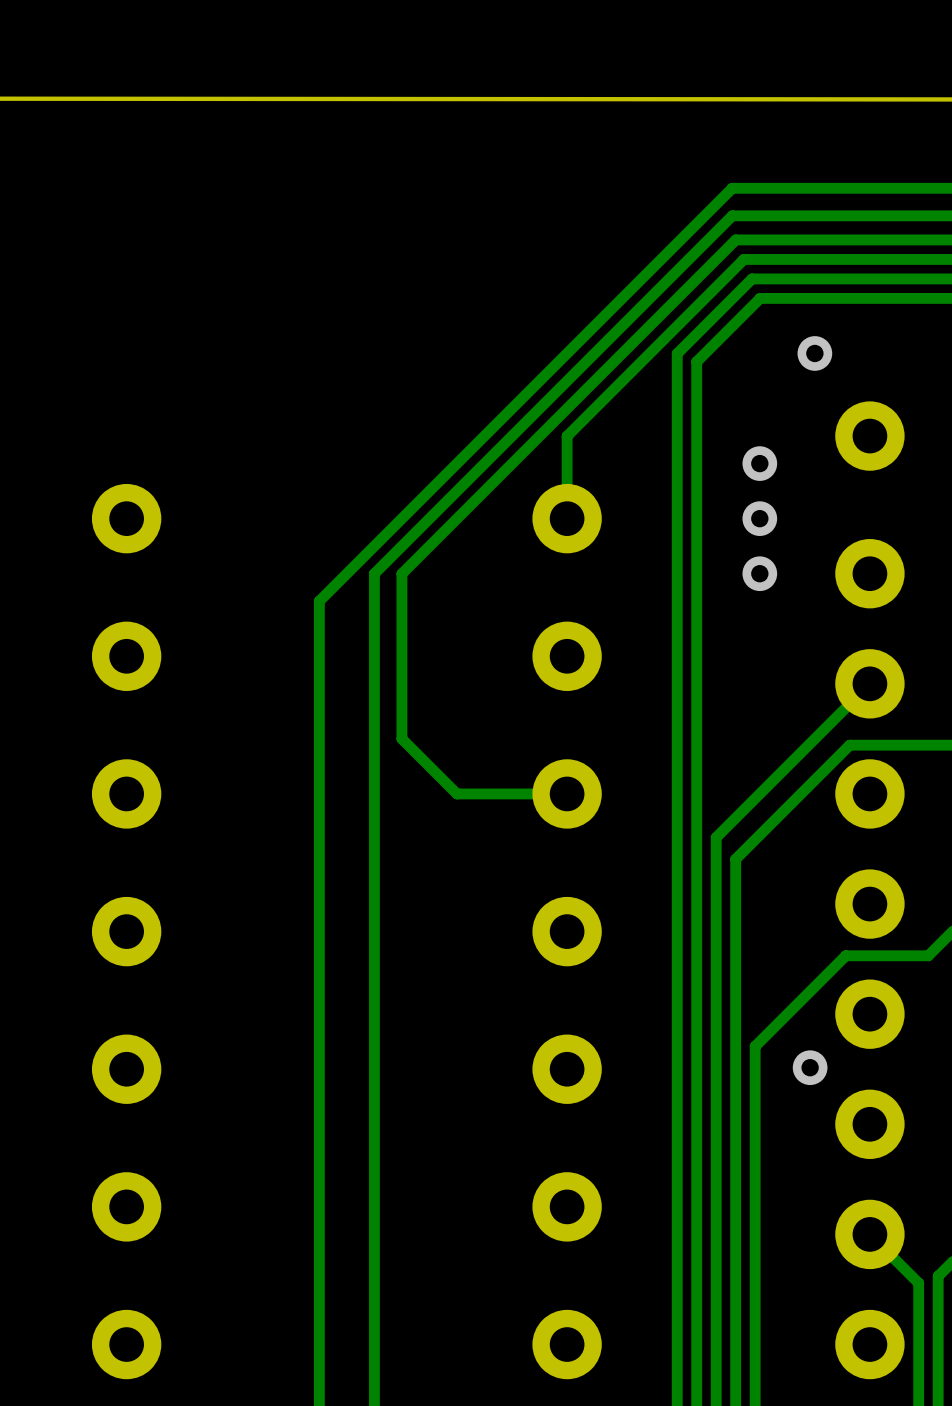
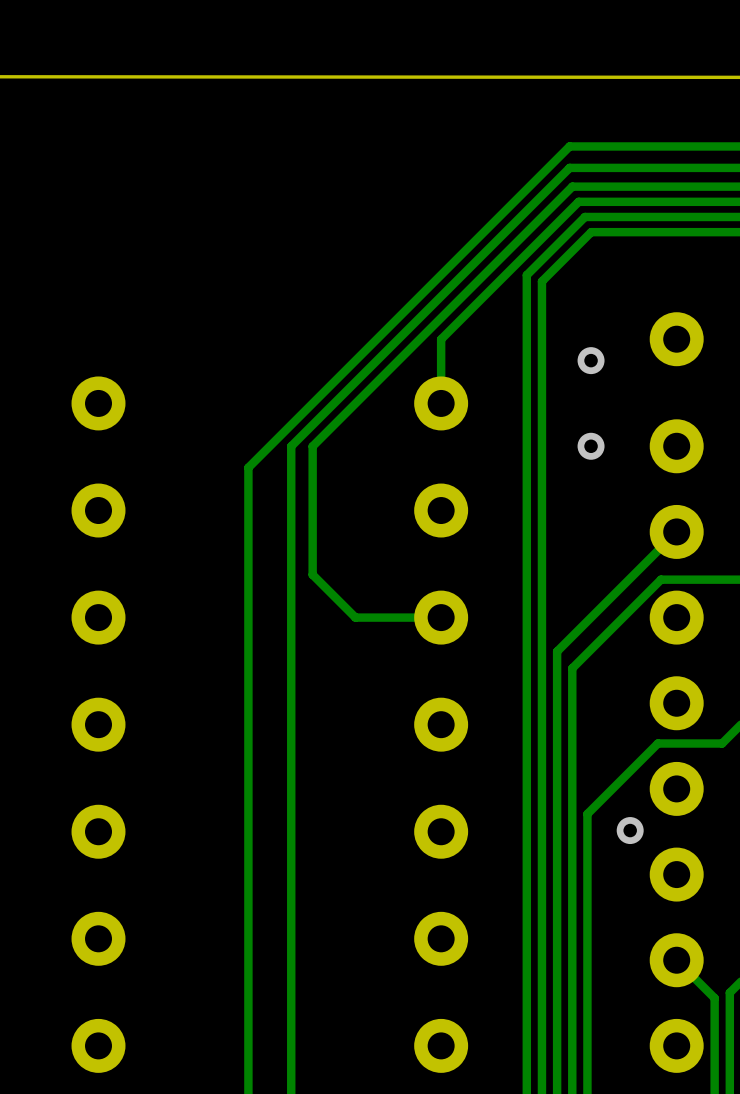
via: (814, 353) -> none
via: (759, 518) -> none

